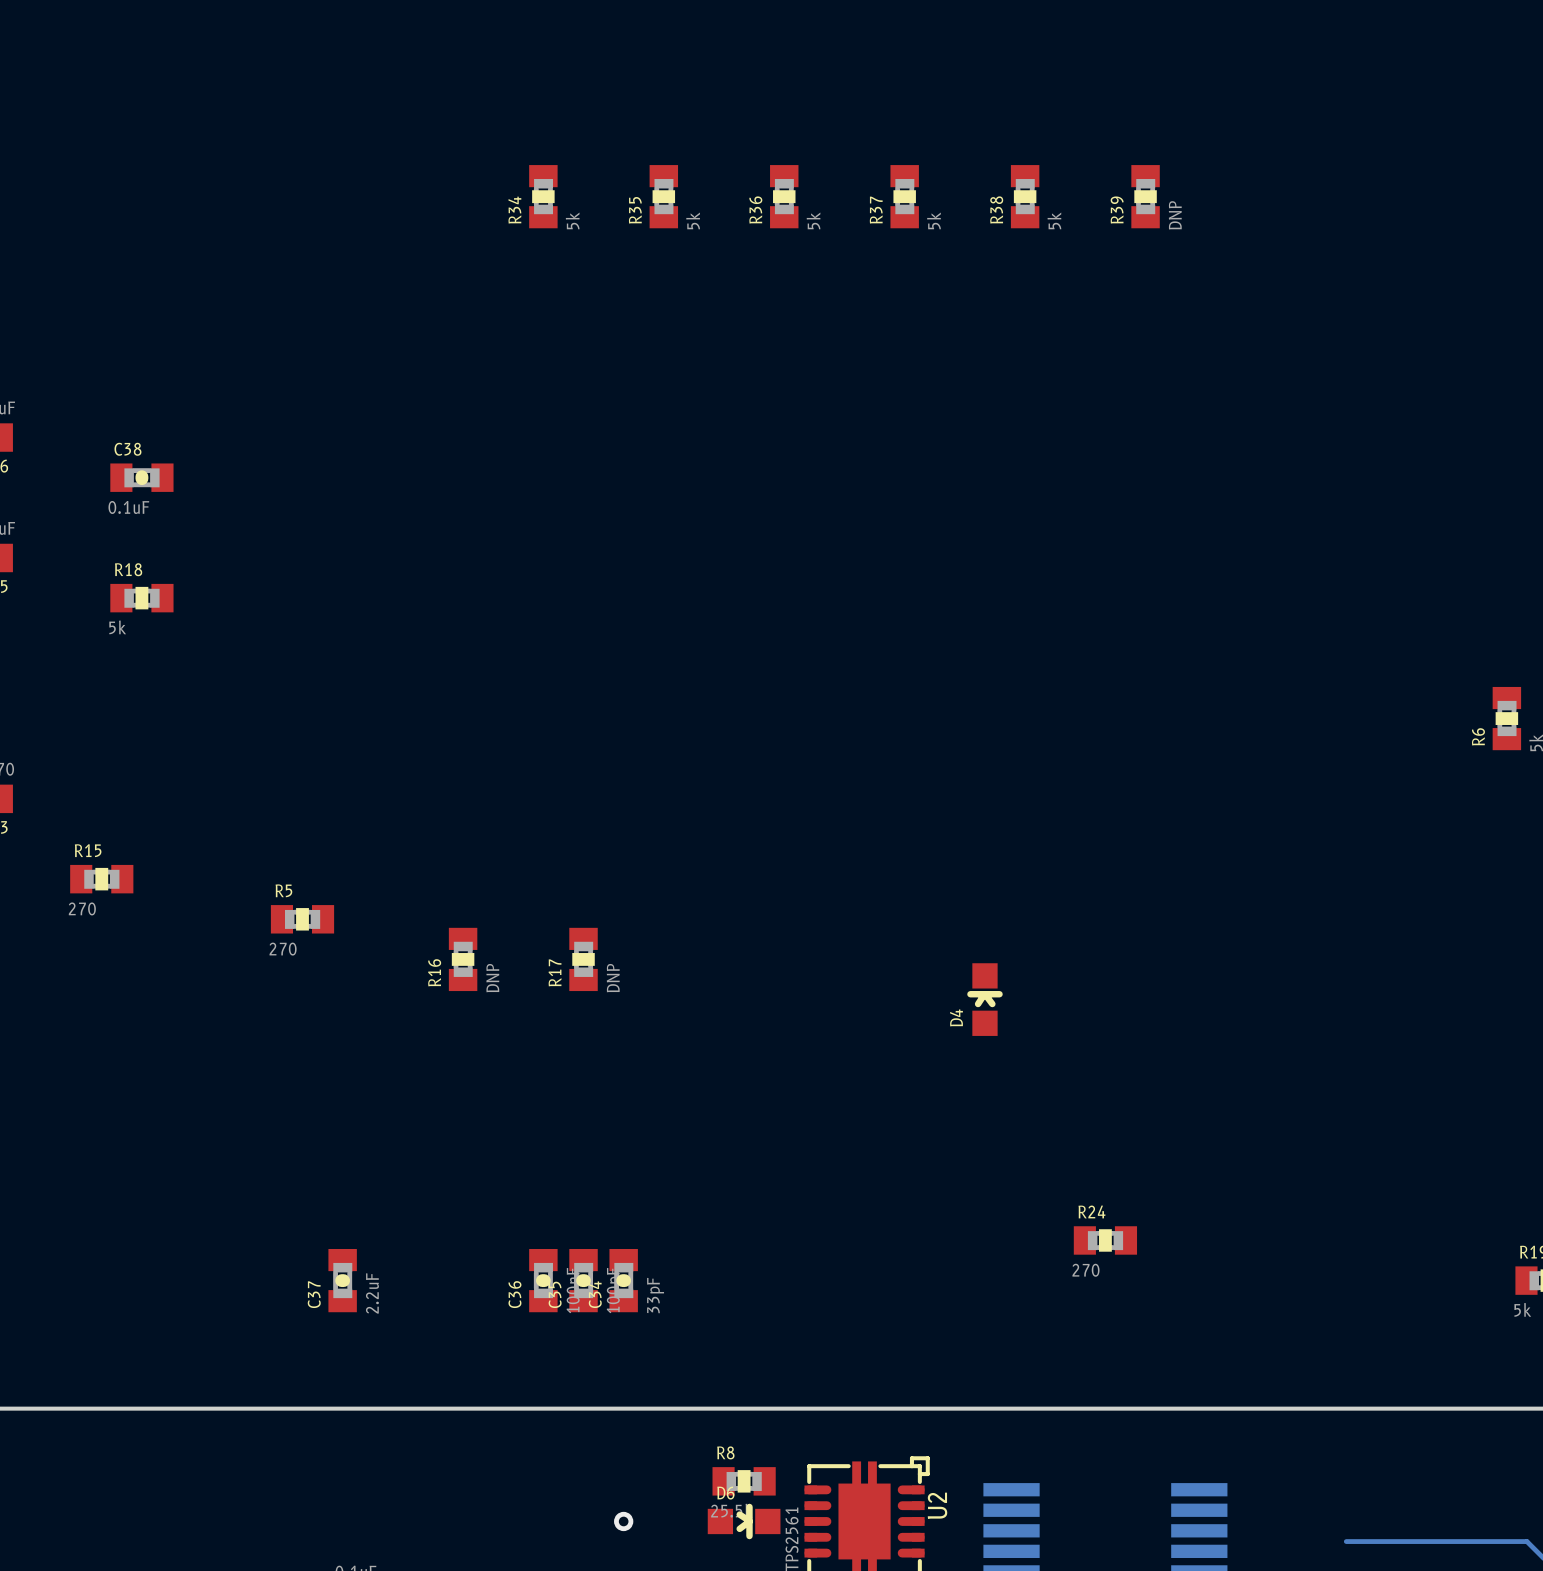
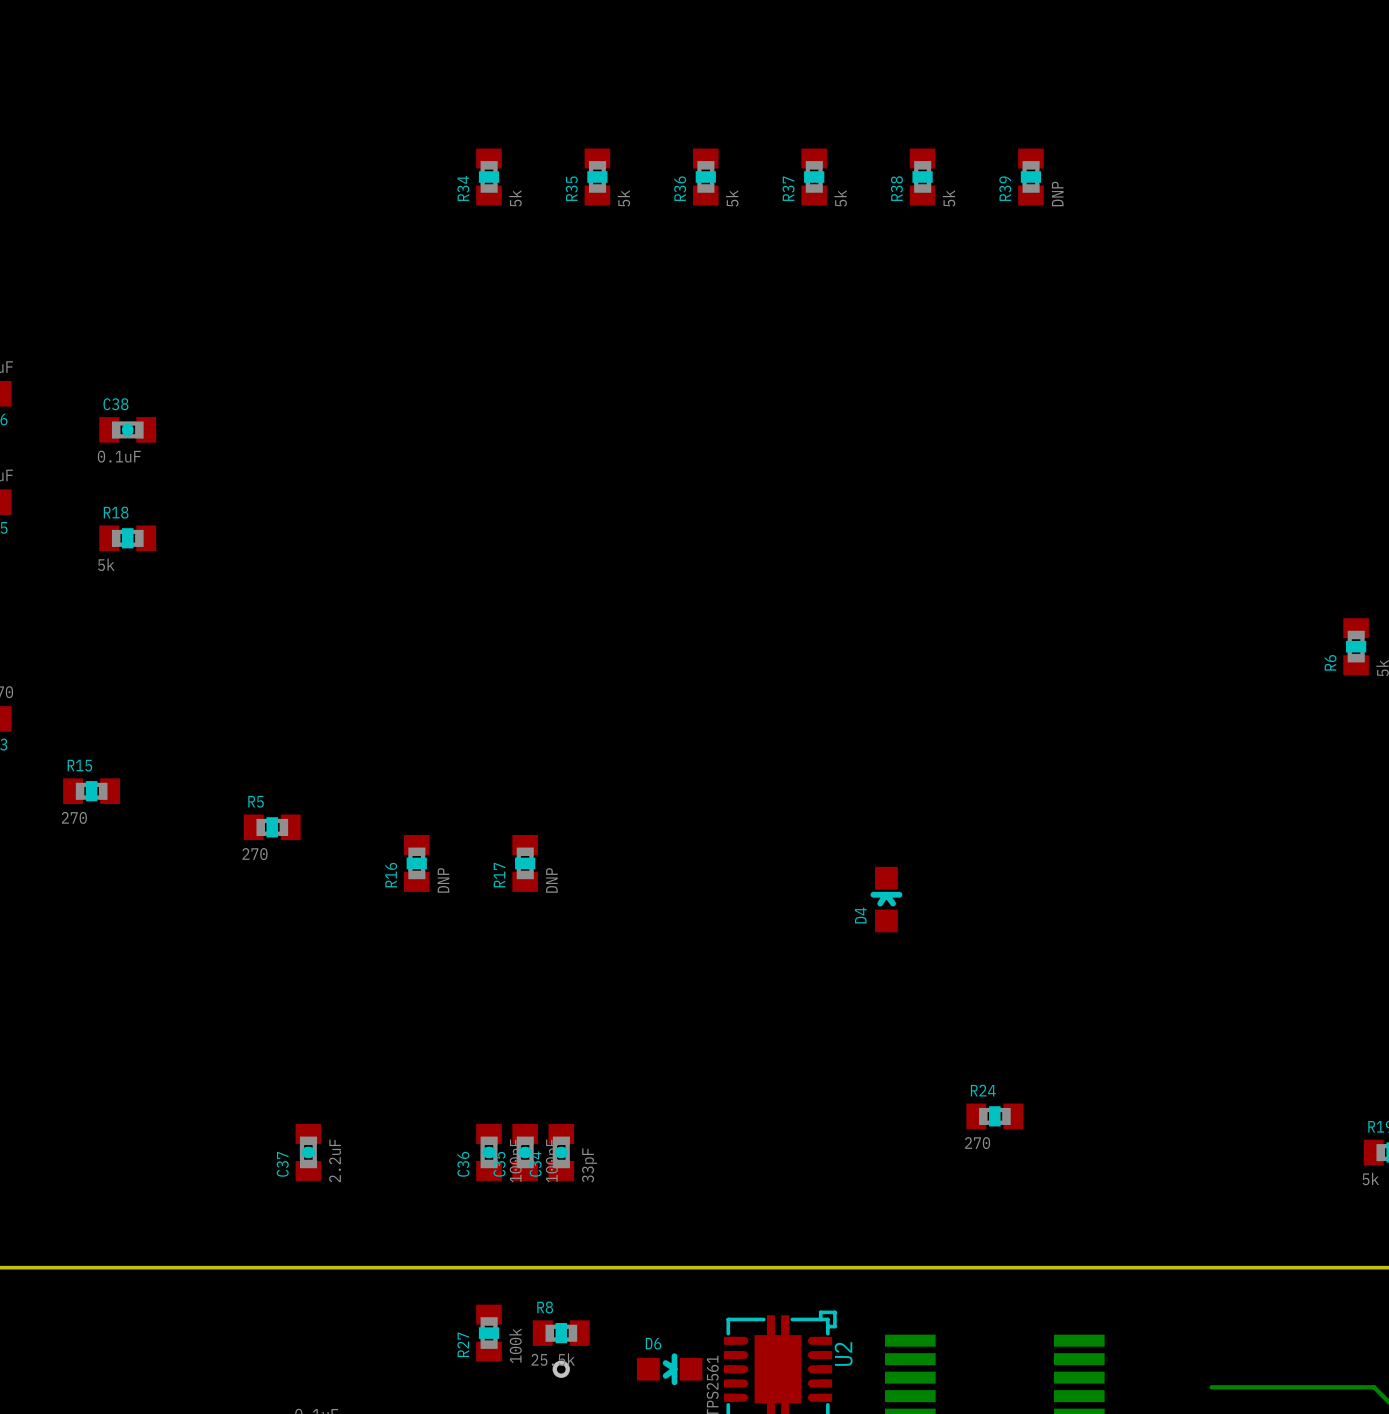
R27: none -> 100k (489, 1333)
R8 position: (744, 1481) -> (561, 1333)

